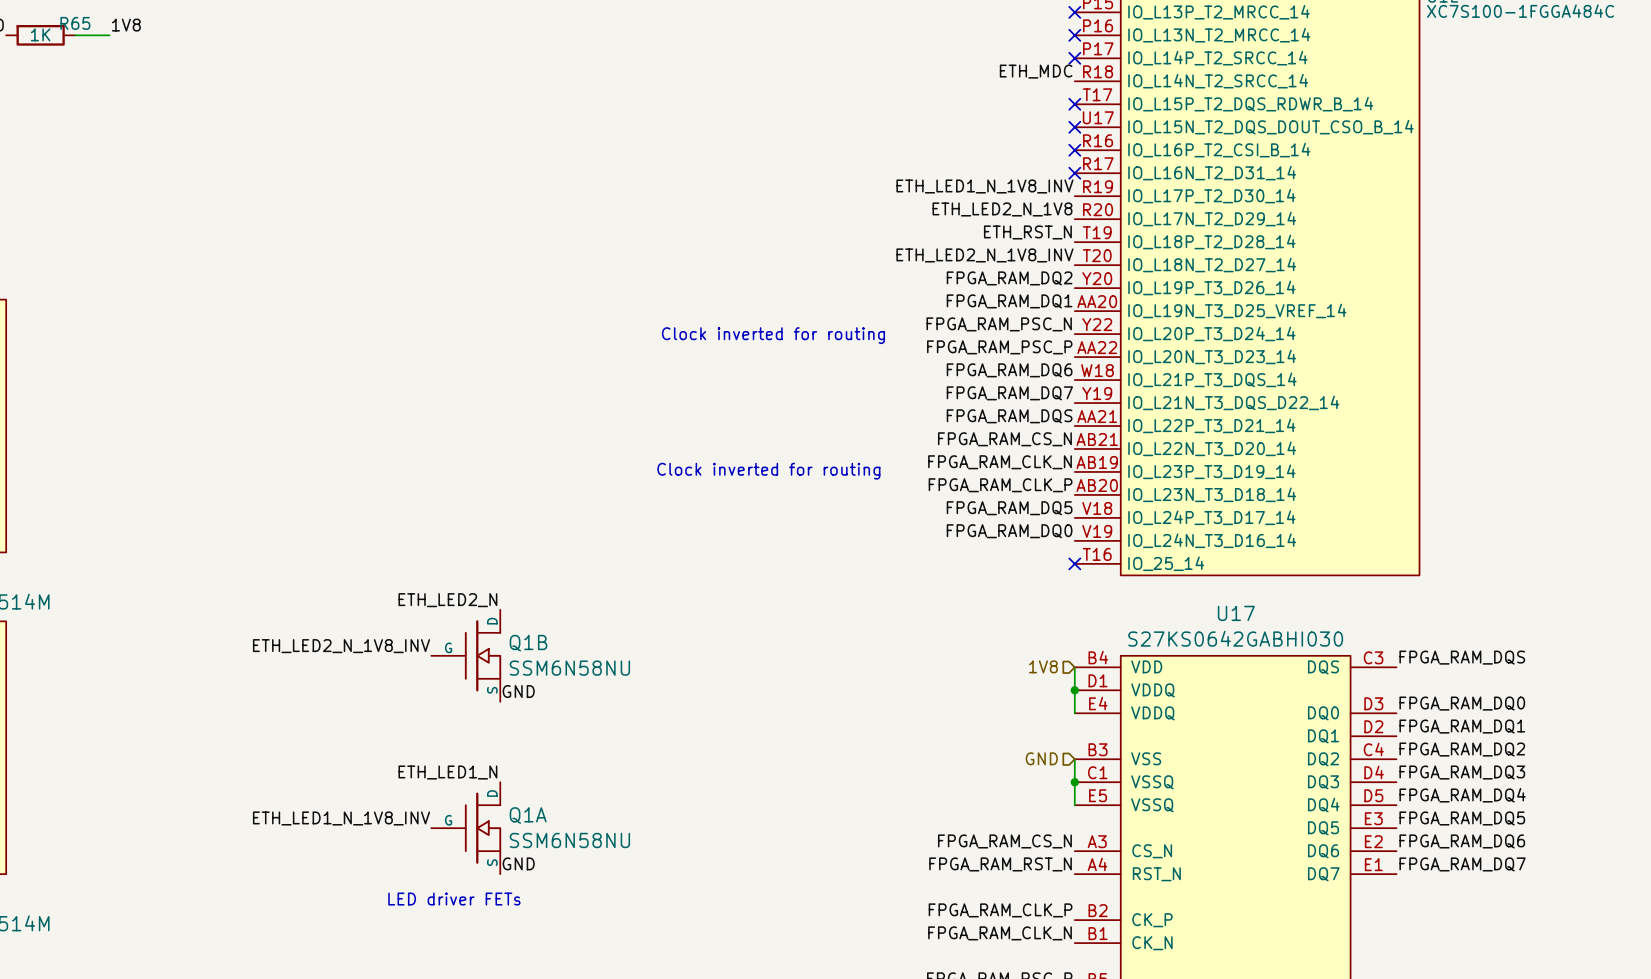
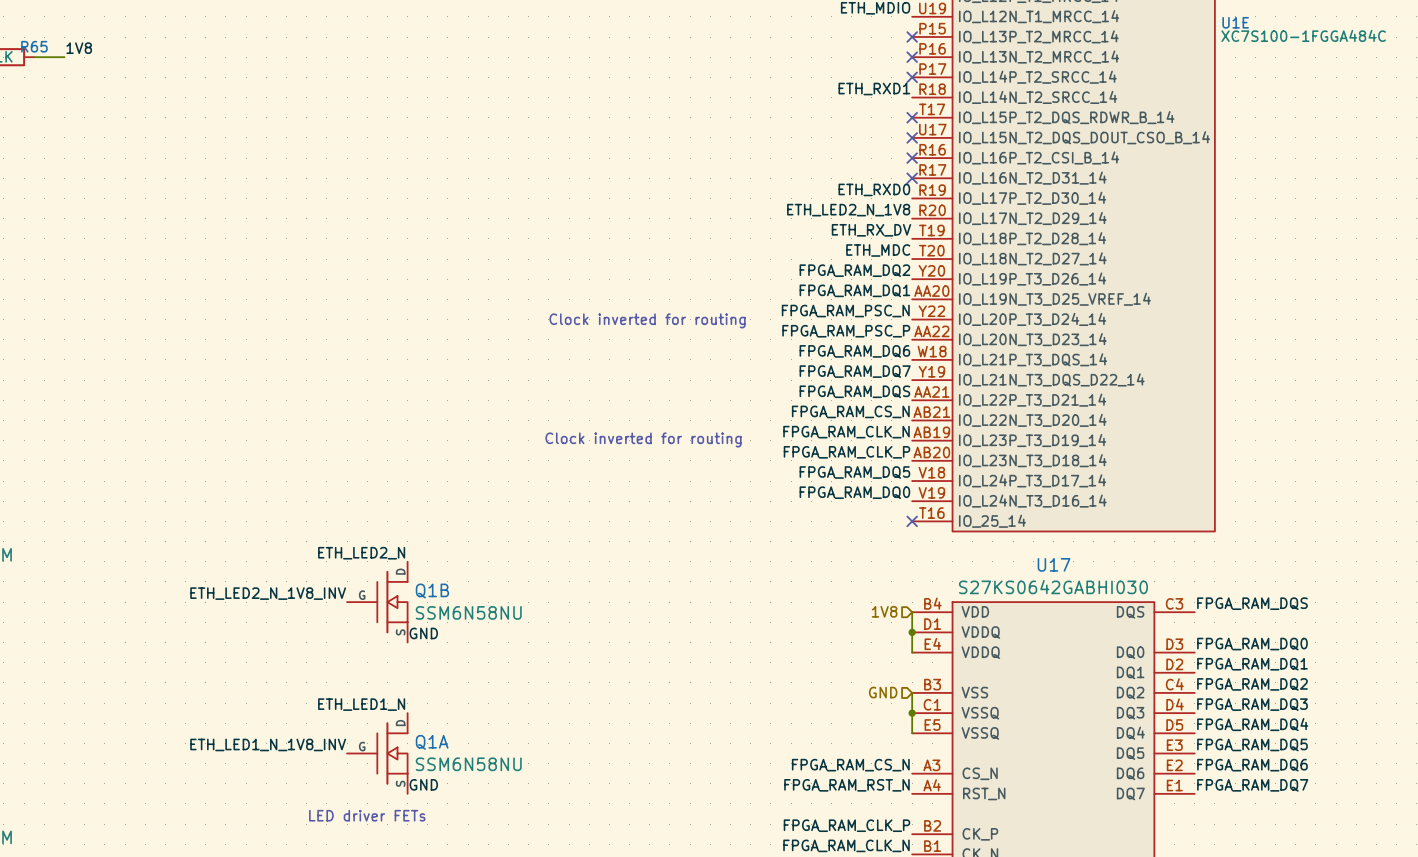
label: ETH_MDC (1036, 71) -> ETH_RXD1 (874, 89)
label: ETH_LED1_N_1V8_INV (984, 186) -> ETH_RXD0 (874, 189)
label: ETH_RST_N (1027, 232) -> ETH_RX_DV (871, 230)
label: ETH_LED2_N_1V8_INV (984, 255) -> ETH_MDC (878, 250)

